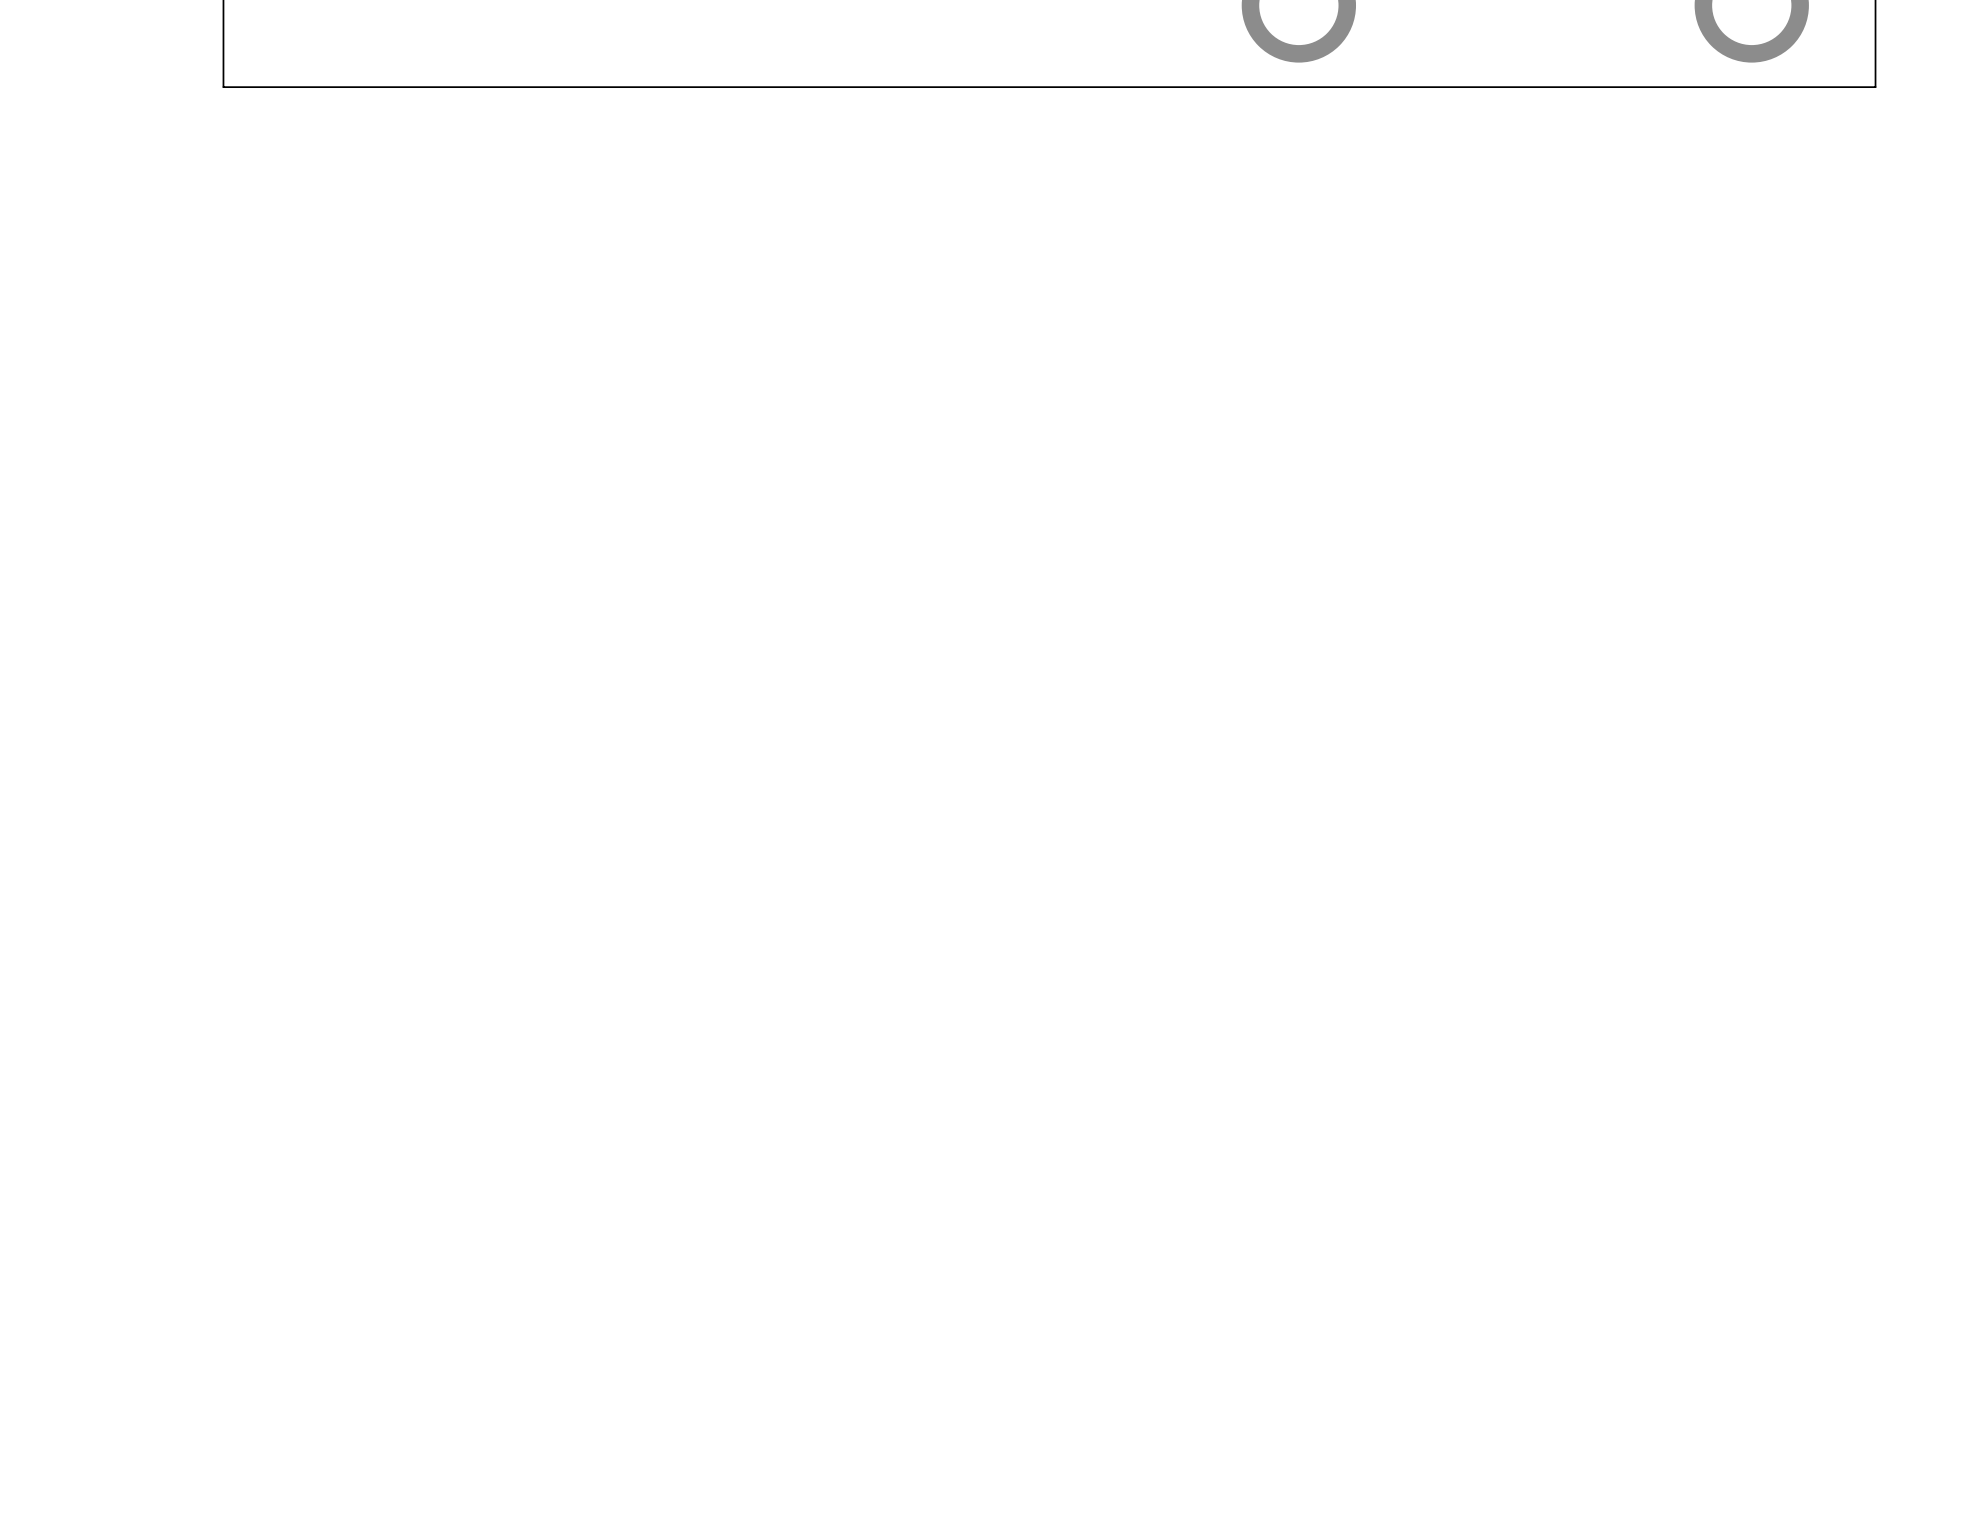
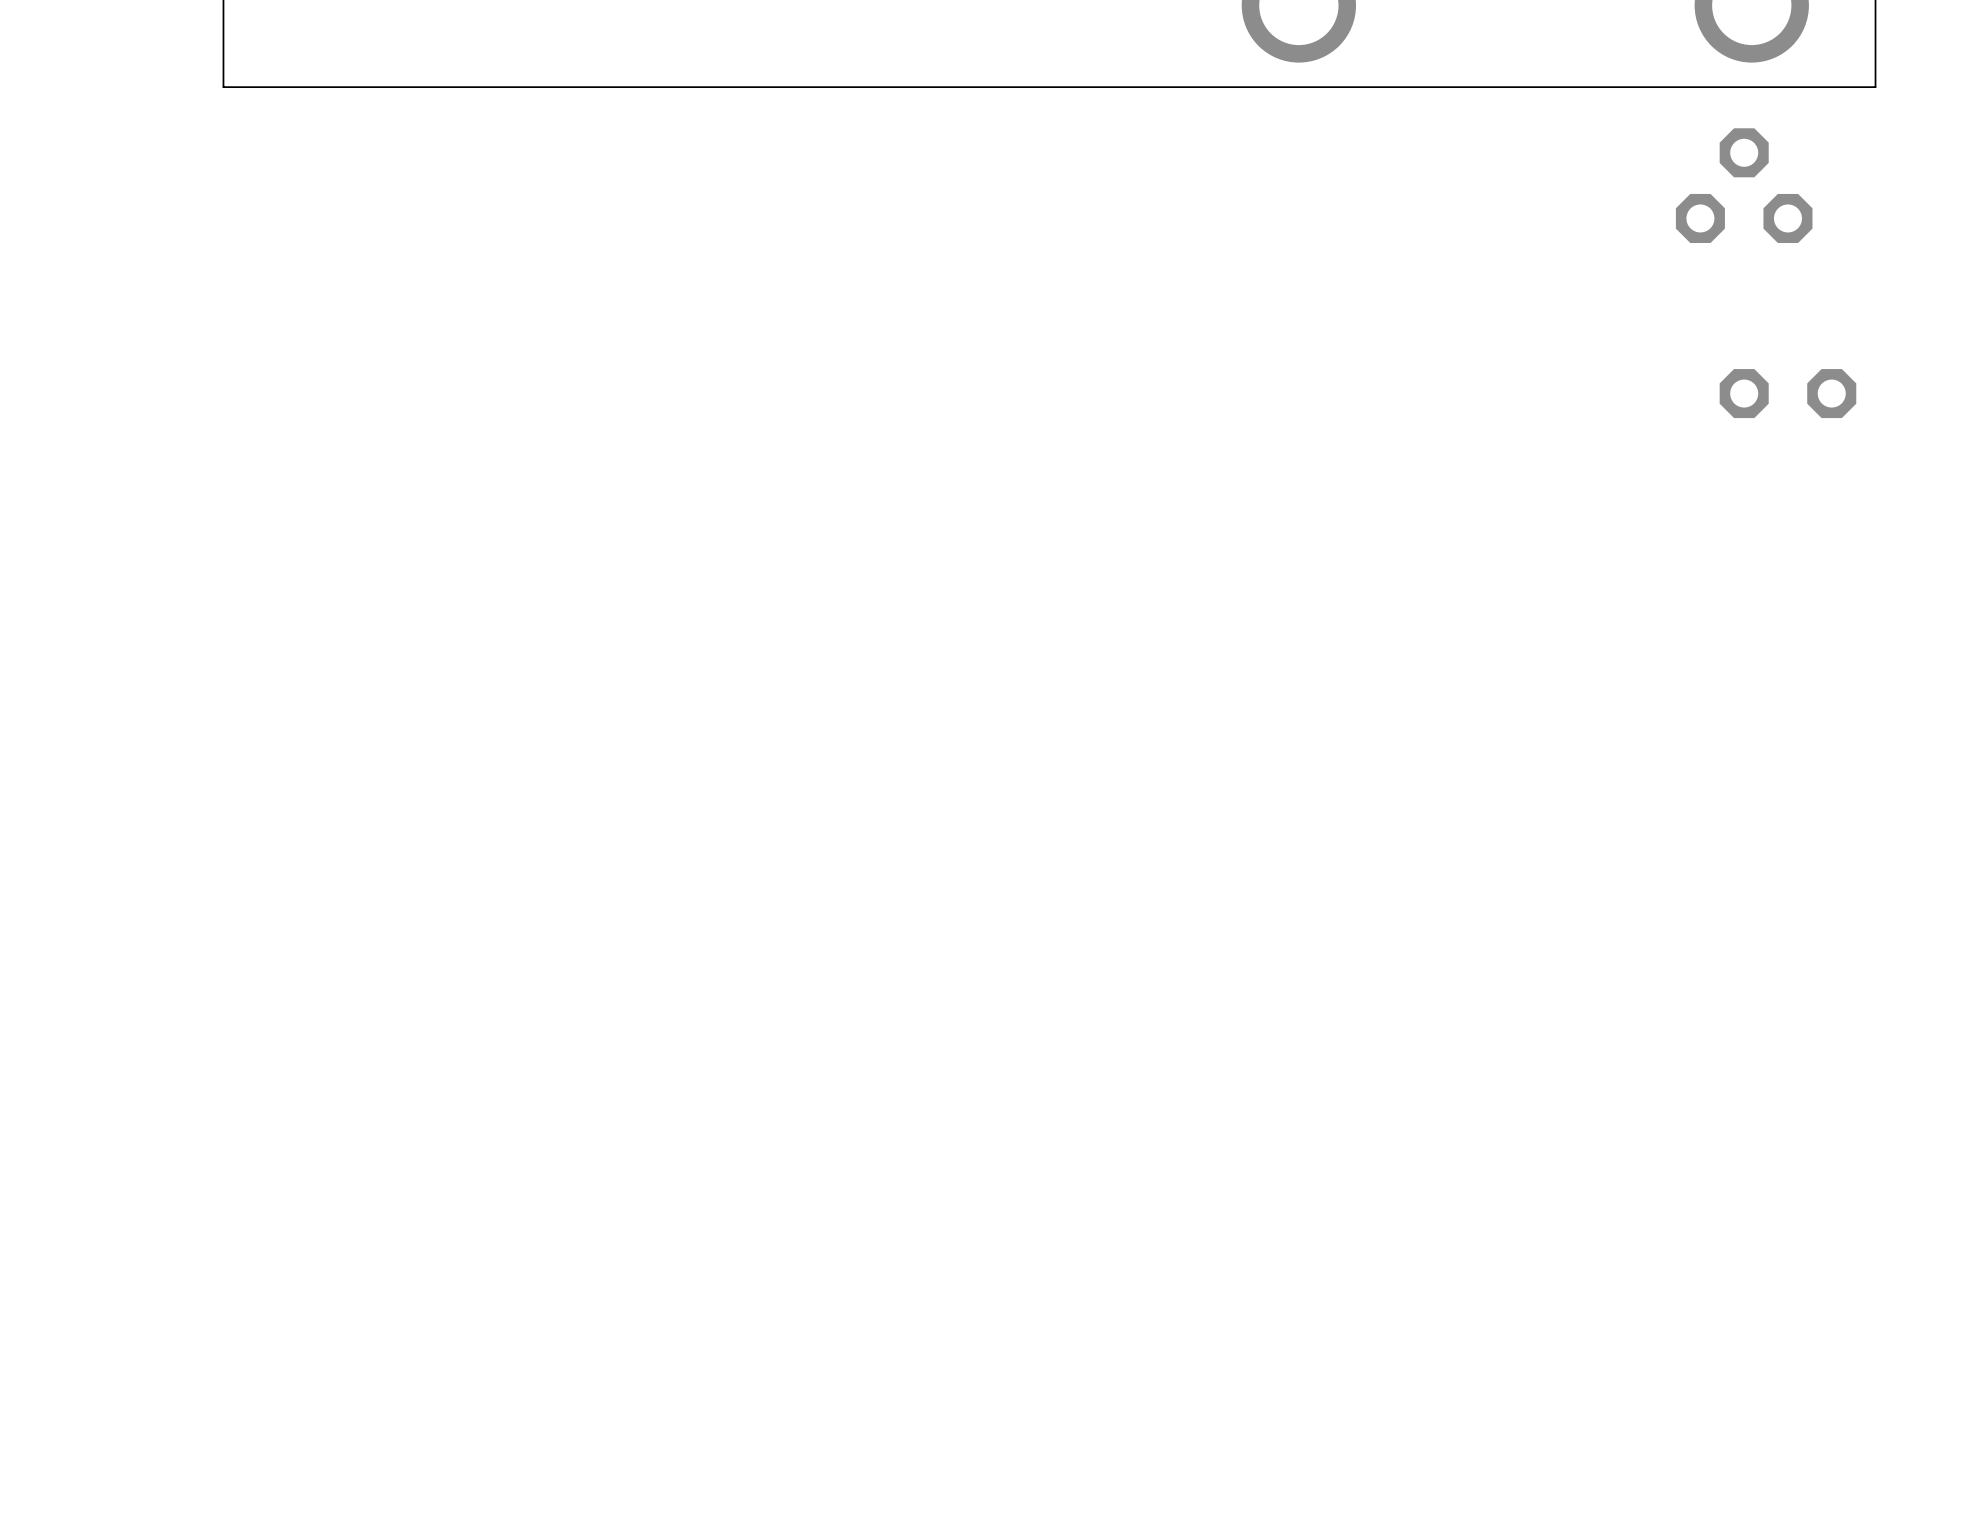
part: none -> (1744, 185)
part: none -> (1787, 393)

